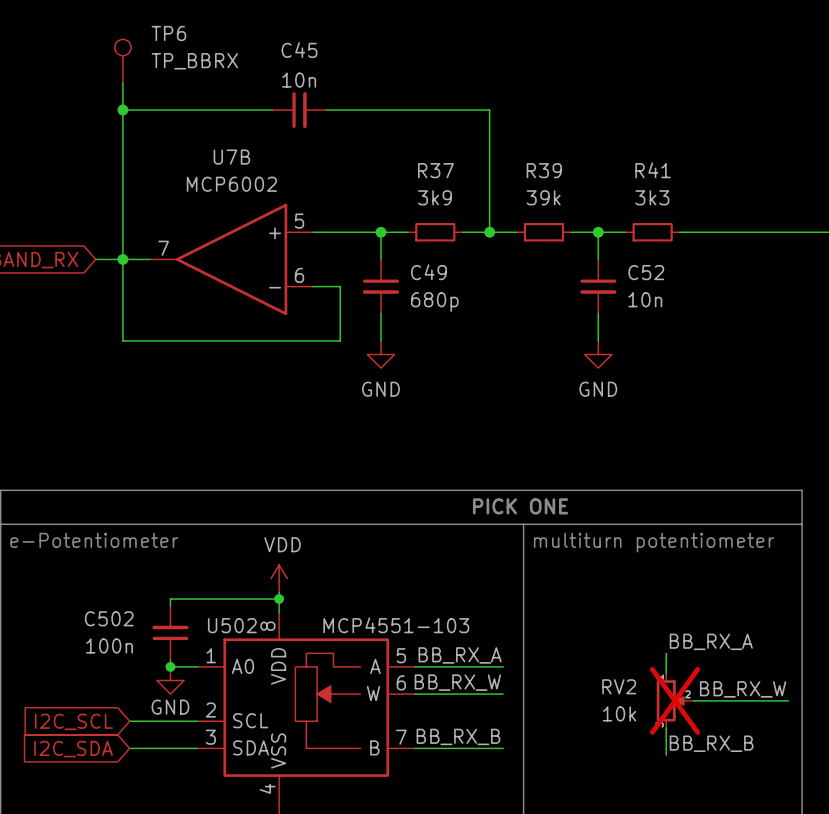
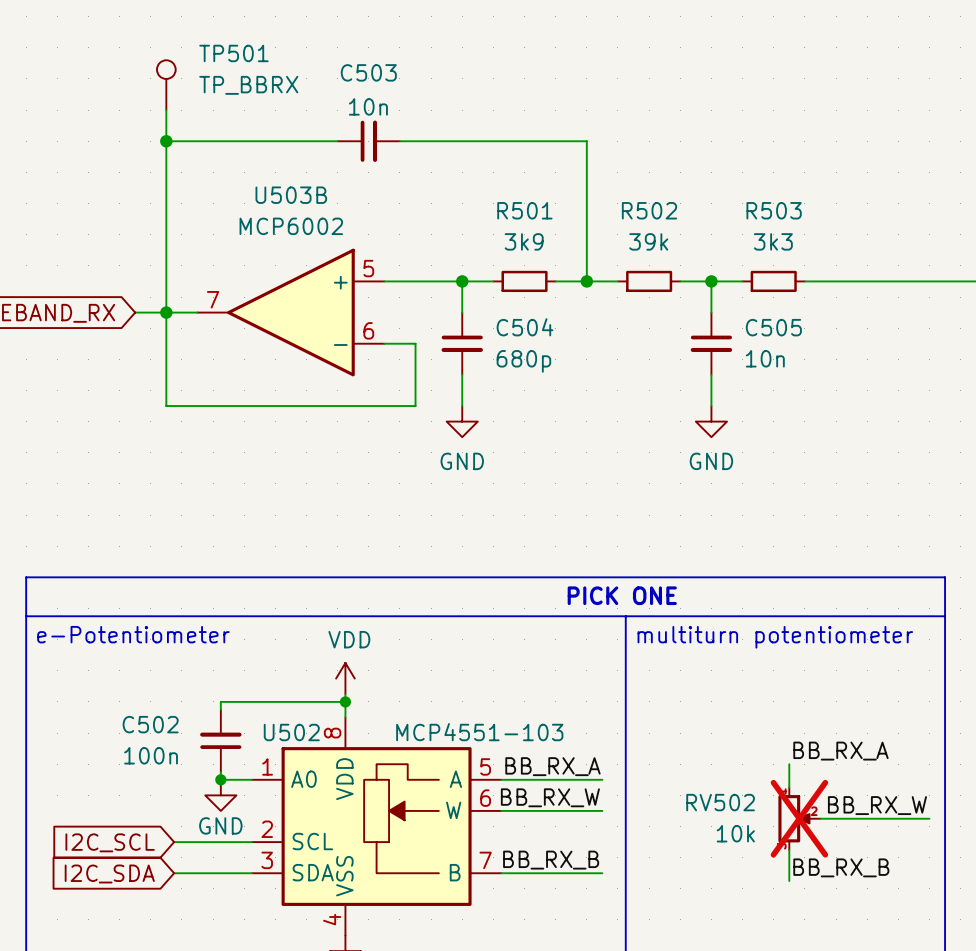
TP6 name: TP6 (168, 33) -> TP501 (233, 53)
C45 name: C45 (299, 50) -> C503 (368, 72)
U7B name: U7B (231, 157) -> U503B (291, 195)
R37 name: R37 (435, 170) -> R501 (524, 210)
R39 name: R39 (544, 170) -> R502 (649, 210)
R41 name: R41 (652, 170) -> R503 (774, 210)
C49 name: C49 (428, 272) -> C504 (525, 327)
C52 name: C52 (646, 272) -> C505 (773, 327)
RV2 name: RV2 (619, 686) -> RV502 (720, 802)

